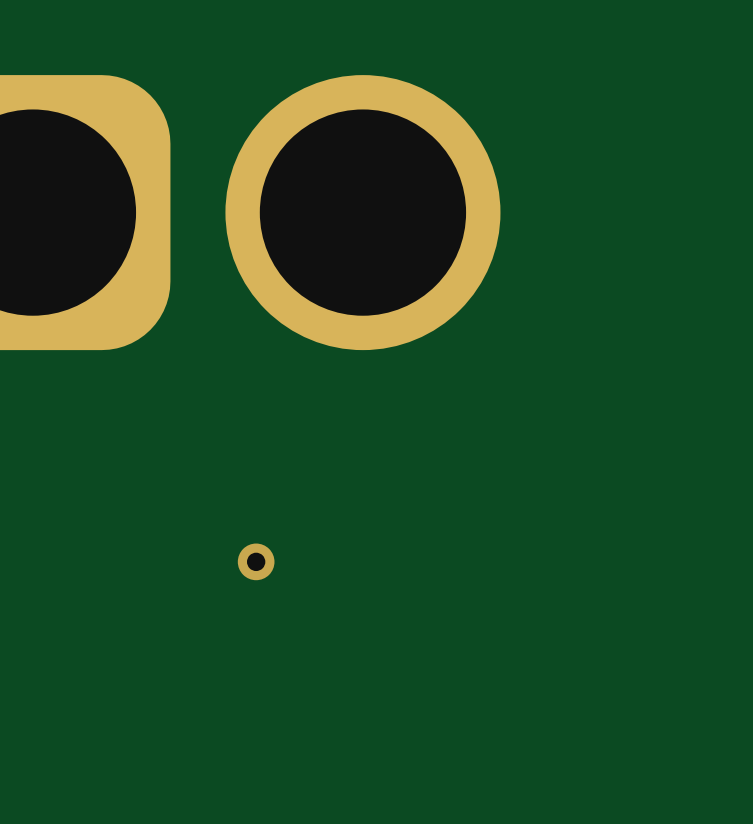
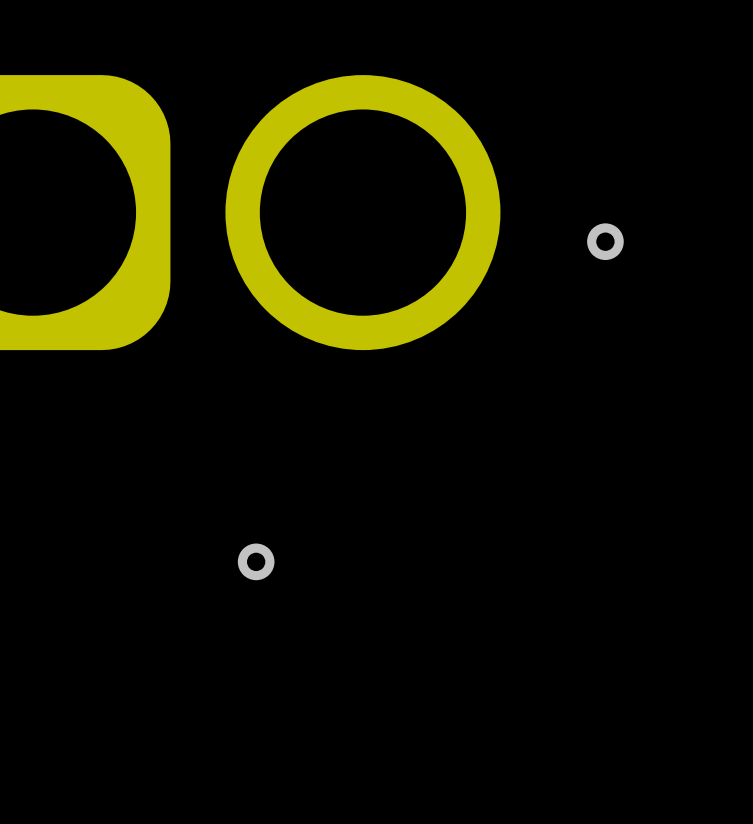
via: none -> (605, 241)

